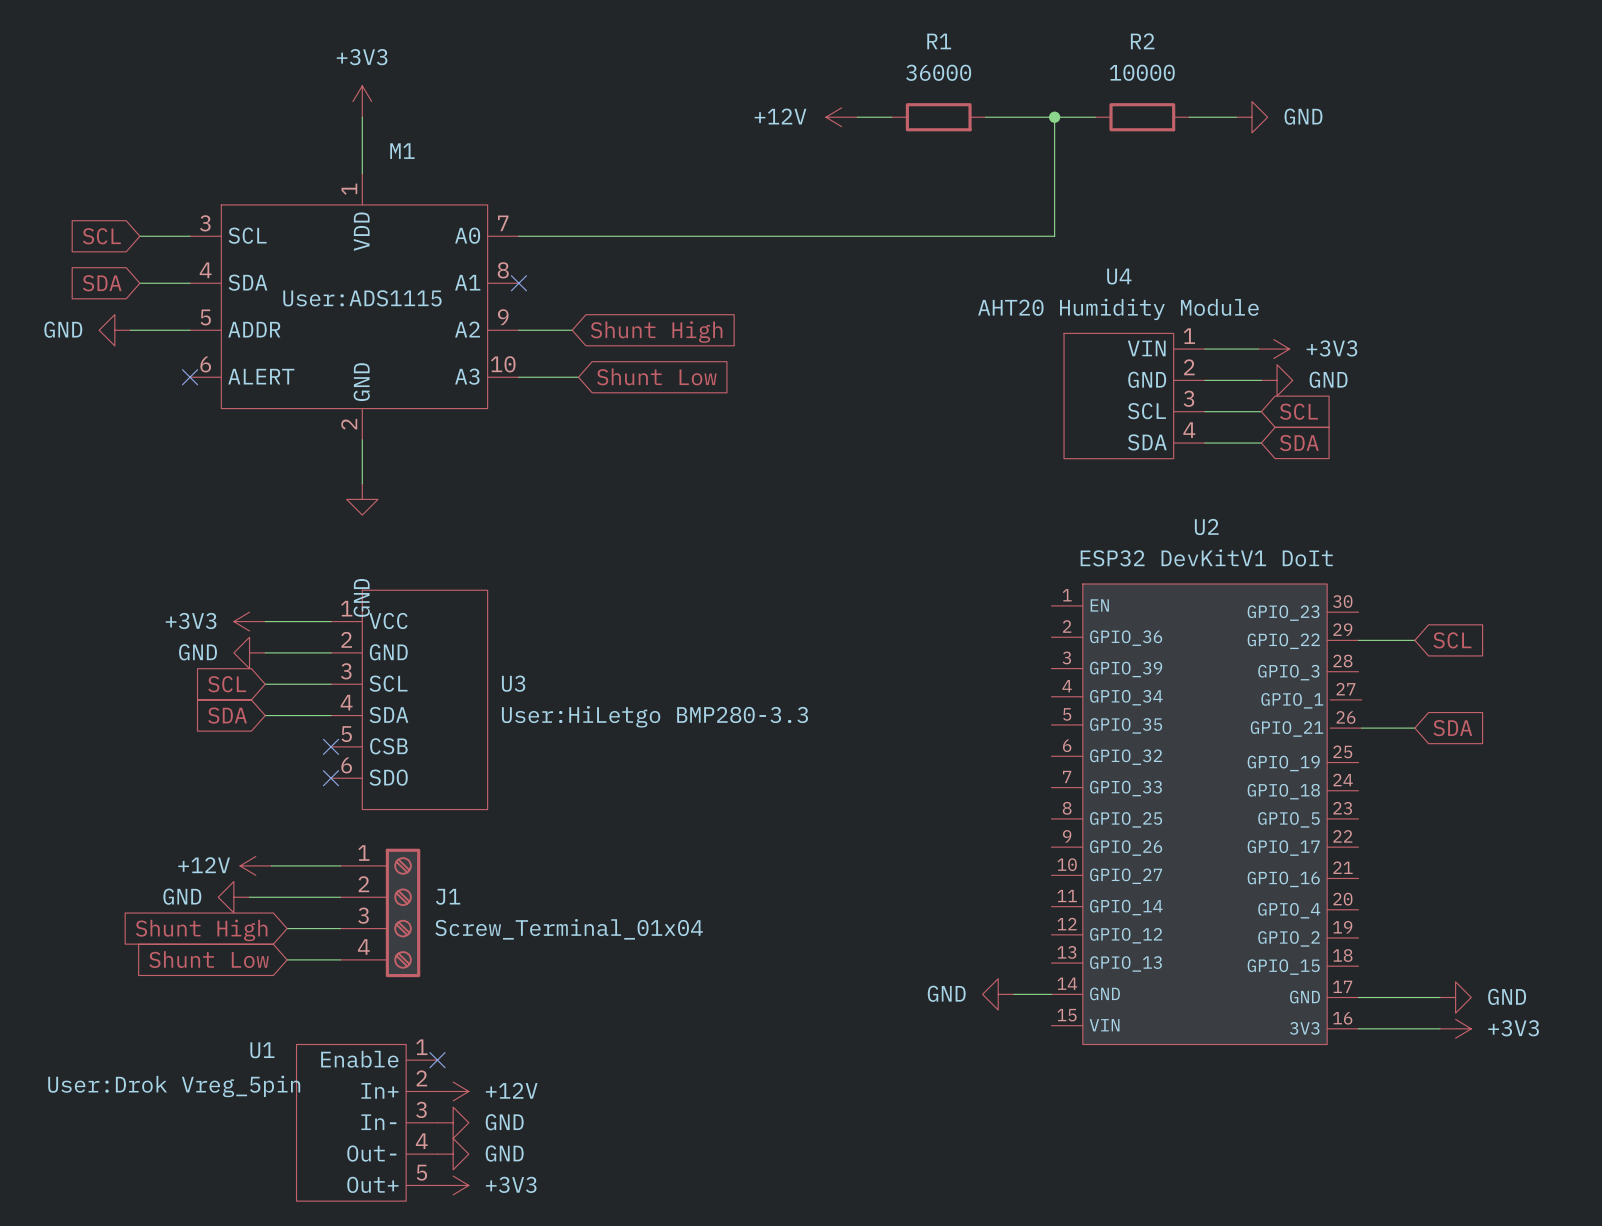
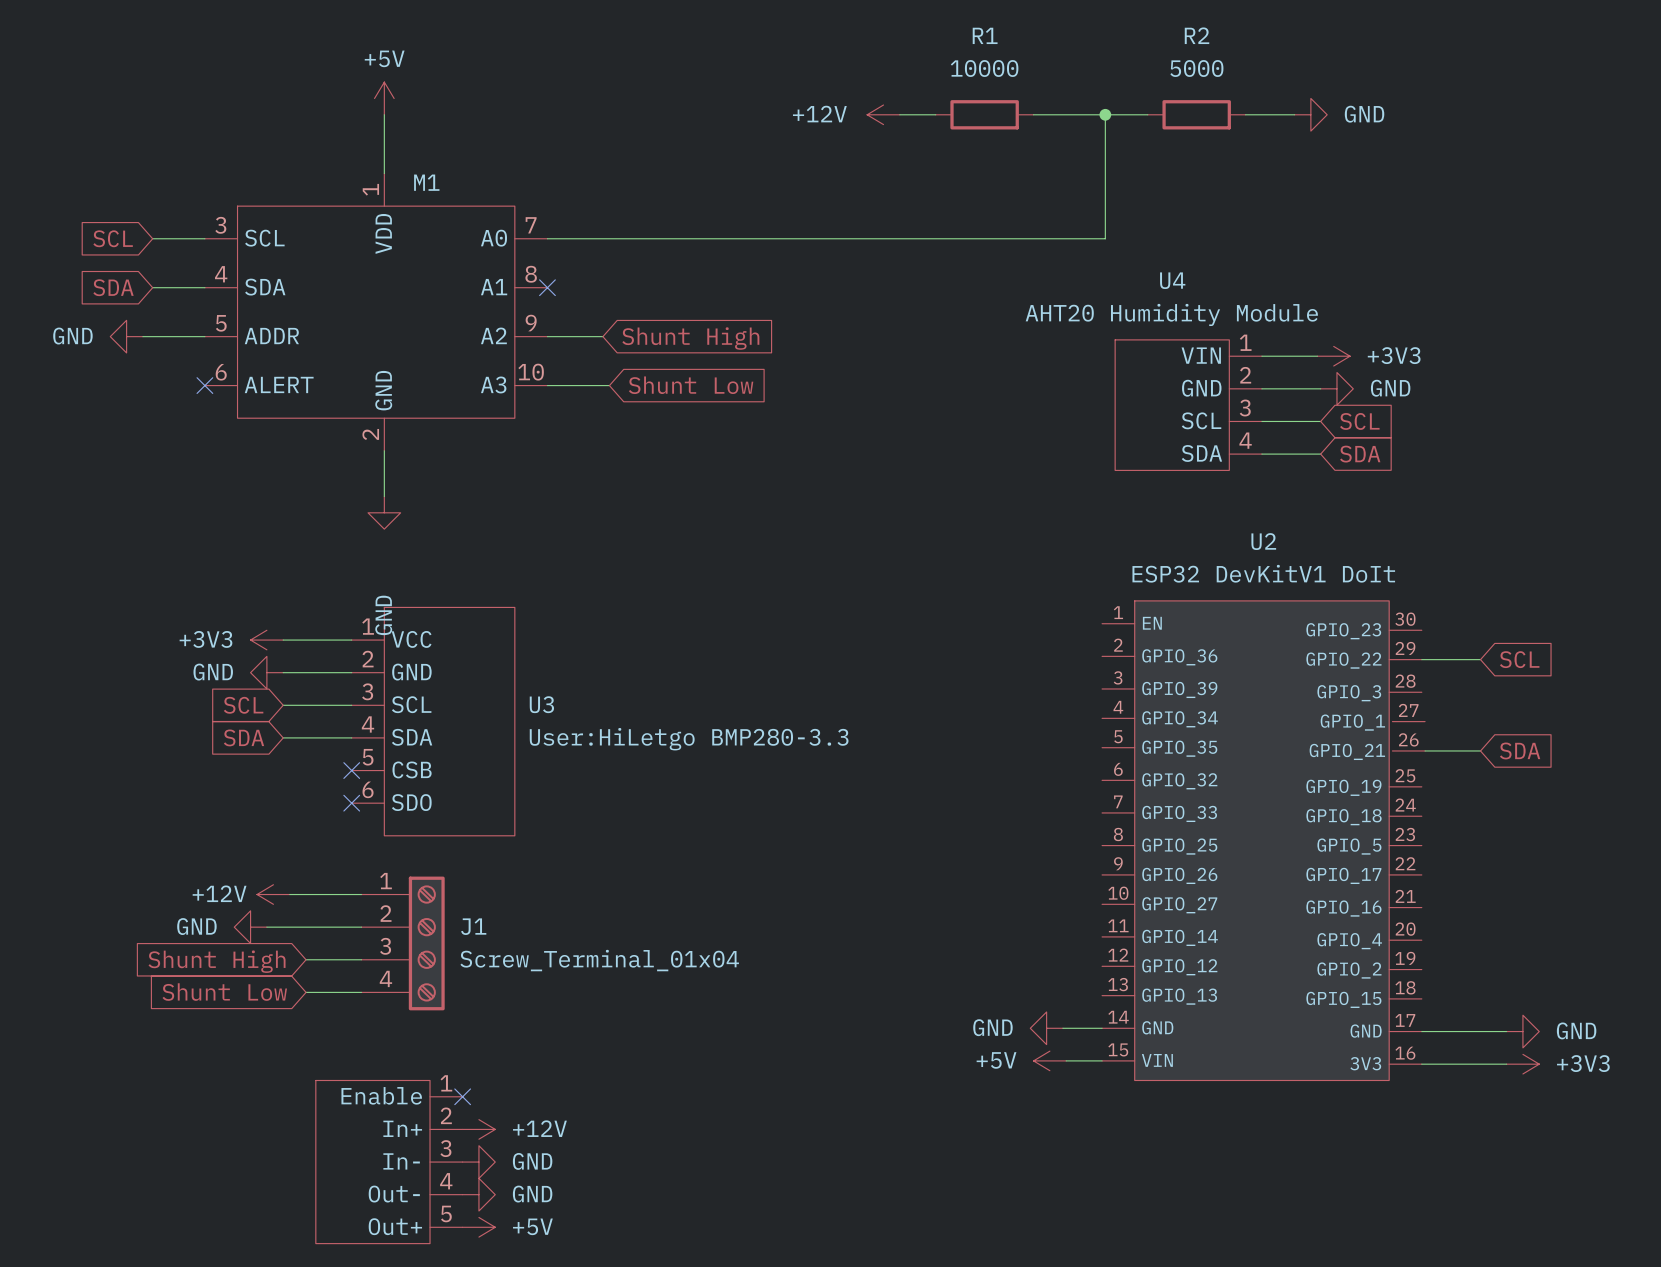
R1 value: 36000 (938, 72) -> 10000 (984, 68)
R2 value: 10000 (1142, 72) -> 5000 (1196, 68)
power symbol: +3V3 (362, 101) -> +5V (384, 98)
M1 name position: M1 (402, 151) -> M1 (426, 182)
M1 text: User:ADS1115 (362, 298) -> none
power symbol: none -> +5V (1049, 1060)
wire: none -> (1066, 1060) (1102, 1060)
U1 name: U1 (262, 1050) -> none
U1 text: User:Drok Vreg_5pin (174, 1086) -> none
power symbol: +3V3 (453, 1185) -> +5V (478, 1227)

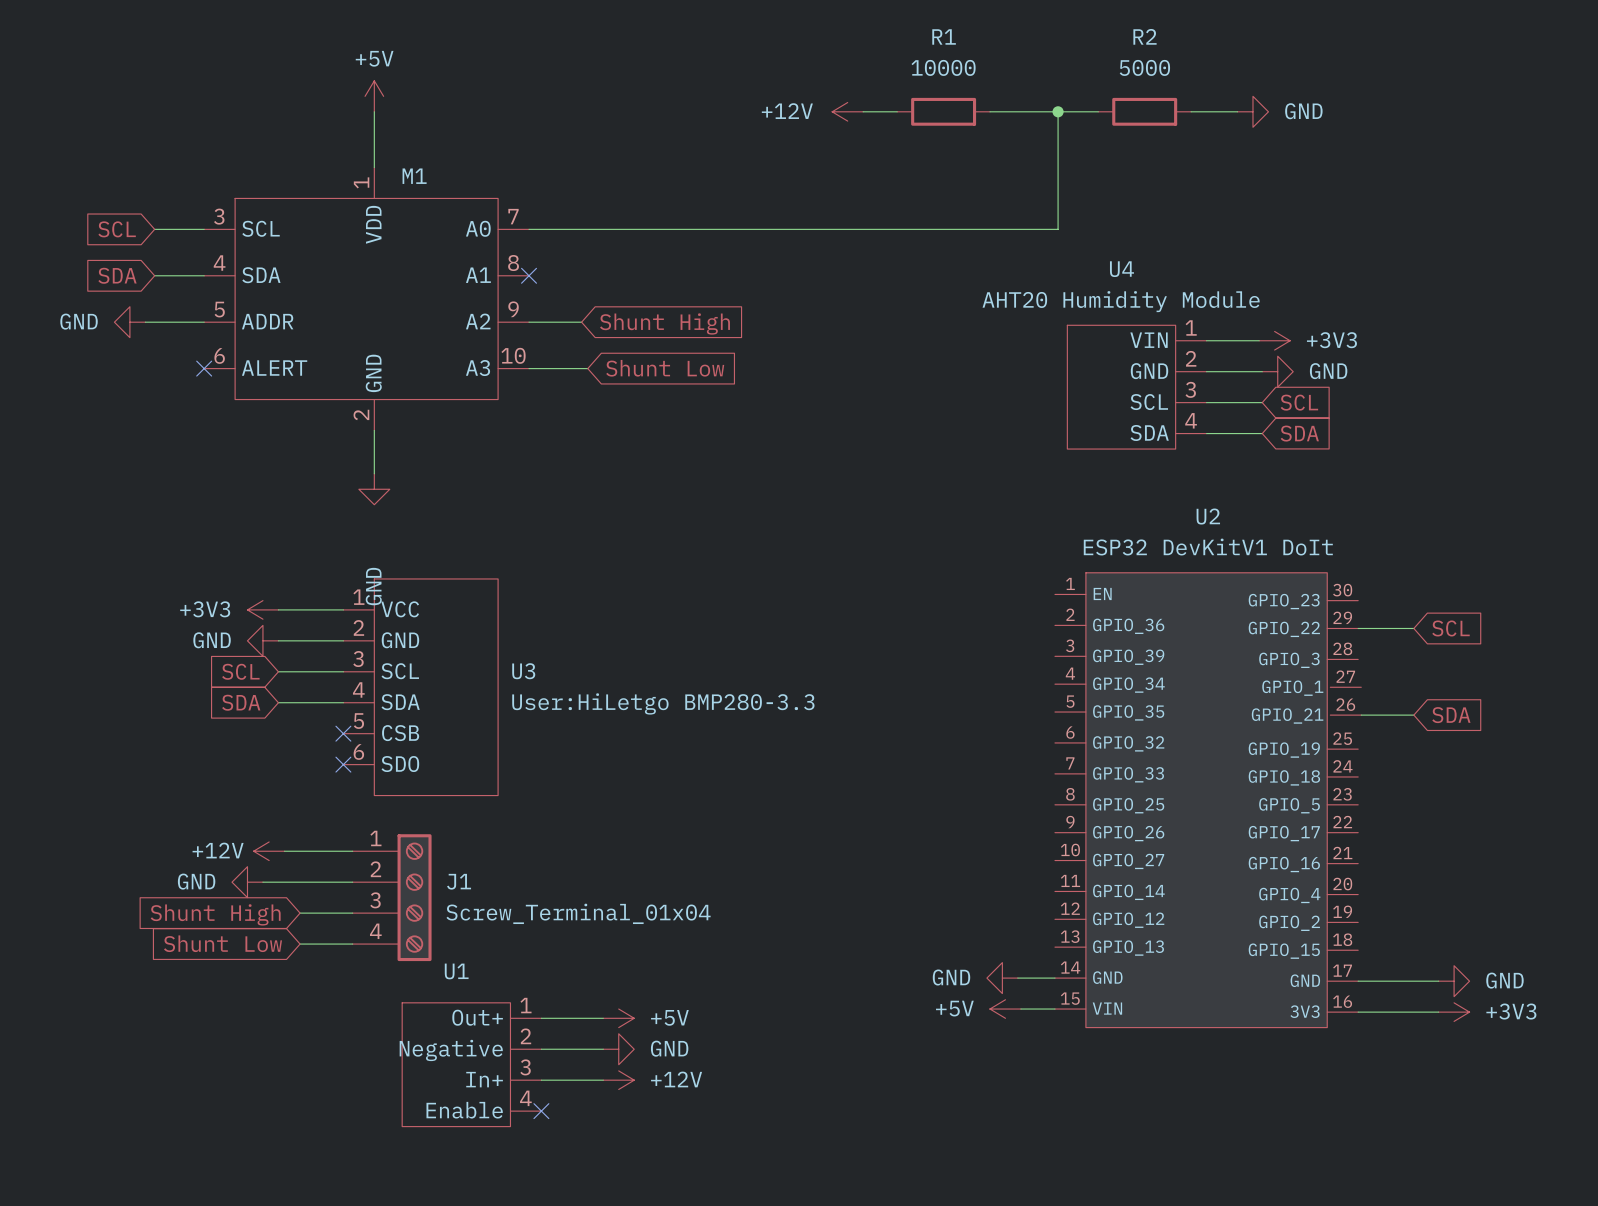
wire: none -> (541, 1018) (603, 1018)
no-connect mark: (462, 1096) -> none
wire: none -> (541, 1049) (603, 1049)
power symbol: none -> GND (618, 1049)
U1: none -> (471, 1064)
power symbol position: +12V (478, 1129) -> +12V (618, 1080)
wire: none -> (541, 1080) (603, 1080)
part: (389, 1162) -> none
power symbol: GND (478, 1162) -> none
no-connect mark: none -> (541, 1111)
power symbol: GND (478, 1194) -> none
power symbol position: +5V (478, 1227) -> +5V (618, 1018)

